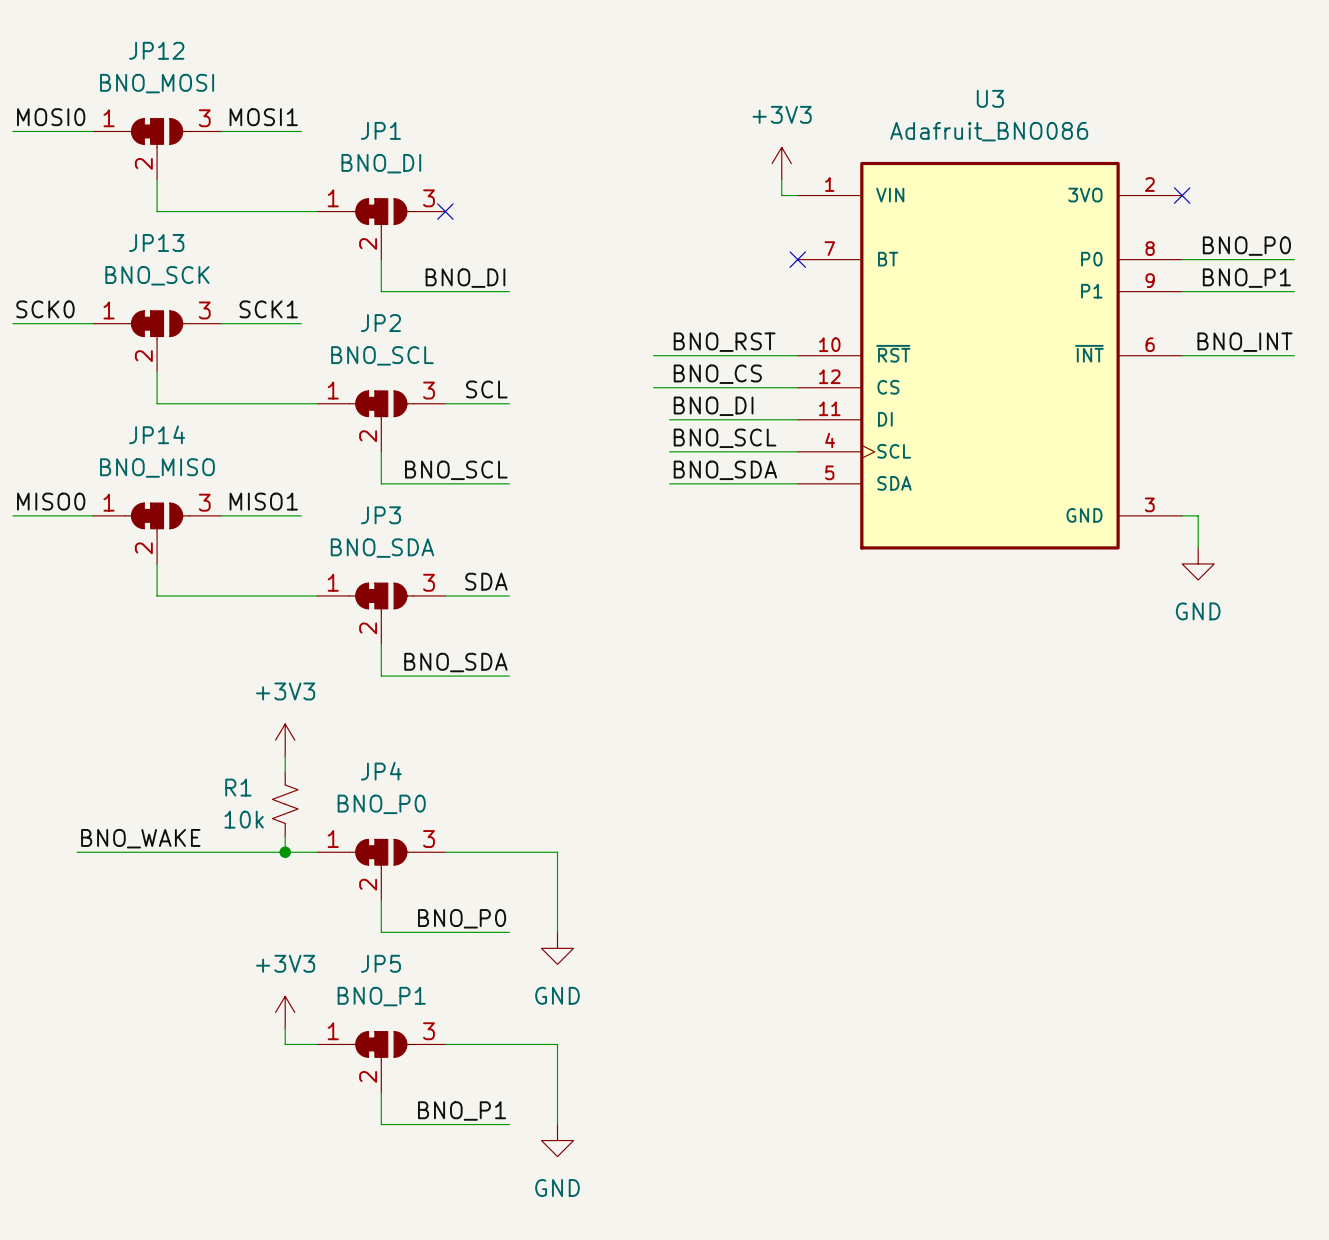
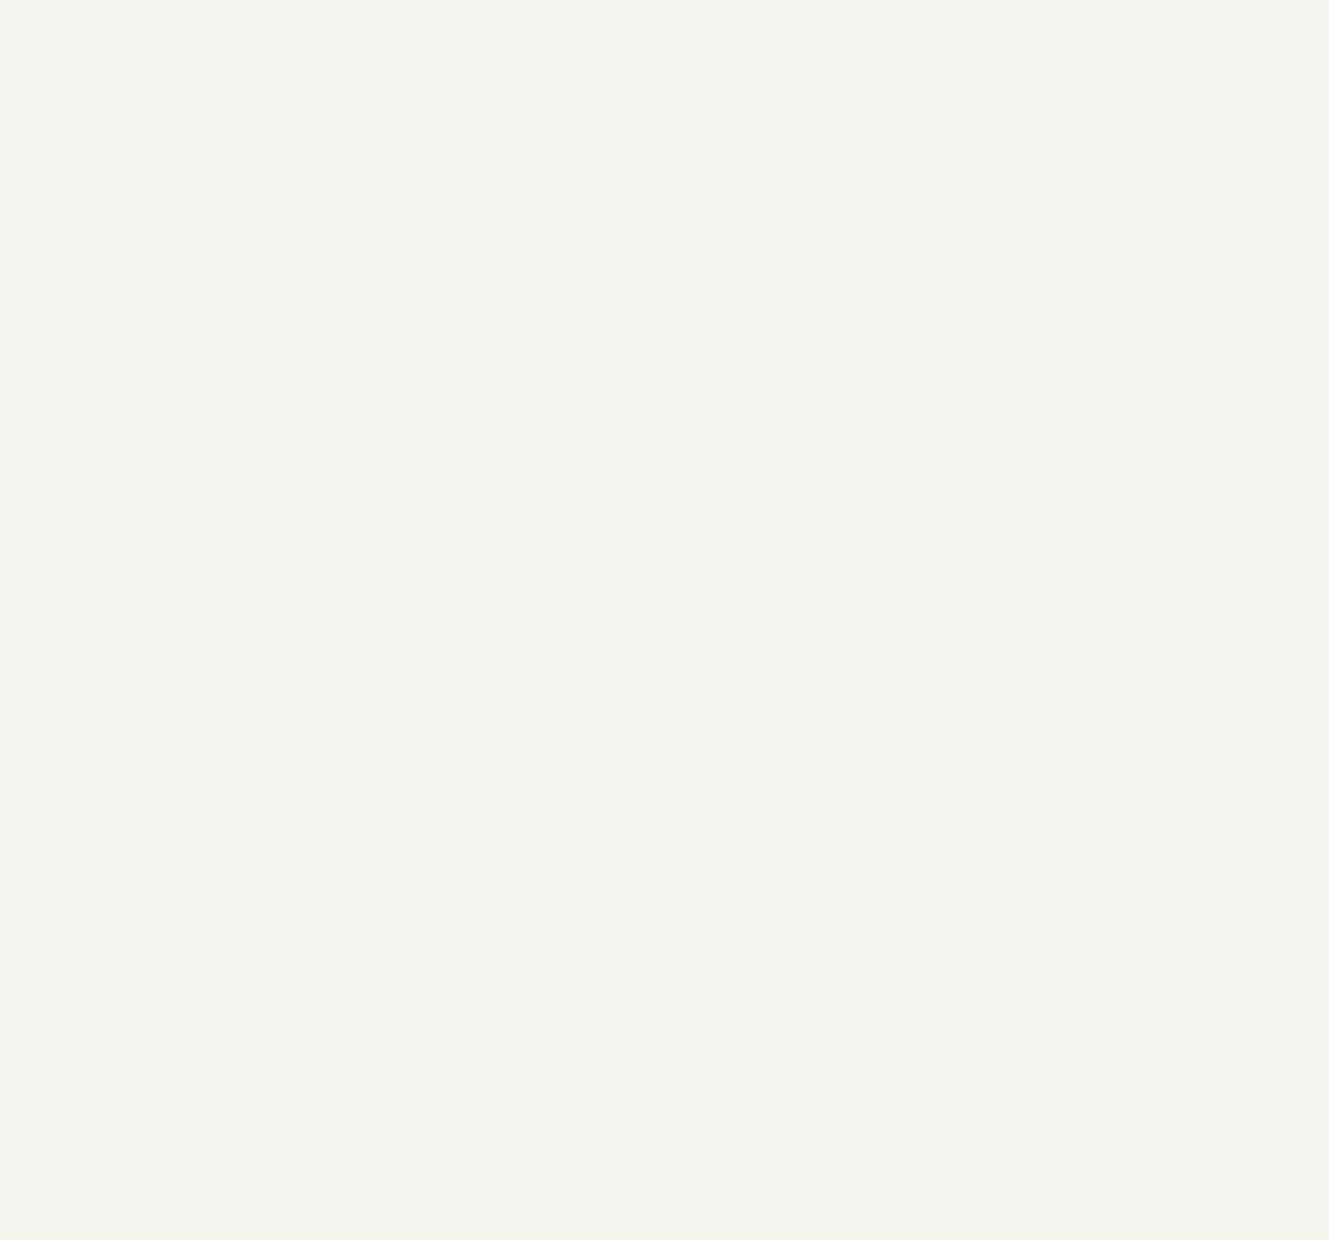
label: MOSI0 (51, 117) -> none
label: MOSI1 (263, 117) -> none
wire: (12, 131) (93, 131) -> none
wire: (221, 131) (301, 131) -> none
JP12: BNO_MOSI (157, 149) -> none
power symbol: +3V3 (781, 163) -> none
wire: (157, 179) (157, 211) (317, 211) -> none
wire: (781, 179) (781, 195) (797, 195) -> none
no-connect mark: (1182, 195) -> none
no-connect mark: (445, 211) -> none
JP1: BNO_DI (381, 229) -> none
label: BNO_P0 (1246, 246) -> none
wire: (381, 259) (381, 291) (509, 291) -> none
no-connect mark: (797, 259) -> none
wire: (1182, 259) (1294, 259) -> none
label: BNO_DI (465, 278) -> none
label: BNO_P1 (1246, 278) -> none
wire: (1182, 291) (1294, 291) -> none
label: SCK0 (45, 309) -> none
label: SCK1 (268, 309) -> none
wire: (12, 323) (93, 323) -> none
wire: (221, 323) (301, 323) -> none
JP13: BNO_SCK (157, 341) -> none
label: BNO_RST (724, 342) -> none
label: BNO_INT (1244, 342) -> none
wire: (653, 355) (797, 355) -> none
U3: Adafruit_BNO086 (989, 355) -> none
wire: (1182, 355) (1294, 355) -> none
wire: (157, 371) (157, 403) (317, 403) -> none
label: BNO_CS (717, 374) -> none
wire: (653, 387) (797, 387) -> none
label: SCL (486, 389) -> none
wire: (445, 403) (509, 403) -> none
label: BNO_DI (713, 406) -> none
wire: (669, 419) (797, 419) -> none
JP2: BNO_SCL (381, 421) -> none
label: BNO_SCL (725, 438) -> none
wire: (381, 451) (381, 483) (509, 483) -> none
wire: (669, 451) (797, 451) -> none
label: BNO_SCL (456, 470) -> none
label: BNO_SDA (725, 470) -> none
wire: (669, 483) (797, 483) -> none
label: MISO0 (51, 501) -> none
label: MISO1 (263, 501) -> none
wire: (12, 515) (93, 515) -> none
wire: (221, 515) (301, 515) -> none
wire: (1182, 515) (1198, 515) (1198, 547) -> none
JP14: BNO_MISO (157, 533) -> none
wire: (157, 563) (157, 595) (317, 595) -> none
power symbol: GND (1198, 563) -> none
label: SDA (486, 581) -> none
wire: (445, 595) (509, 595) -> none
JP3: BNO_SDA (381, 613) -> none
wire: (381, 644) (381, 676) (509, 676) -> none
label: BNO_SDA (455, 662) -> none
power symbol: +3V3 (285, 740) -> none
wire: (285, 756) (285, 772) -> none
R1: 10k (285, 804) -> none
wire: (285, 836) (285, 852) -> none
label: BNO_WAKE (140, 838) -> none
wire: (76, 852) (317, 852) -> none
junction: (285, 852) -> none
wire: (445, 852) (557, 852) (557, 932) -> none
JP4: BNO_P0 (381, 869) -> none
wire: (381, 900) (381, 932) (509, 932) -> none
label: BNO_P0 (462, 918) -> none
power symbol: GND (557, 948) -> none
power symbol: +3V3 (285, 1012) -> none
wire: (285, 1028) (285, 1044) (317, 1044) -> none
wire: (445, 1044) (557, 1044) (557, 1124) -> none
JP5: BNO_P1 (381, 1062) -> none
wire: (381, 1092) (381, 1124) (509, 1124) -> none
label: BNO_P1 (462, 1111) -> none
power symbol: GND (557, 1140) -> none

